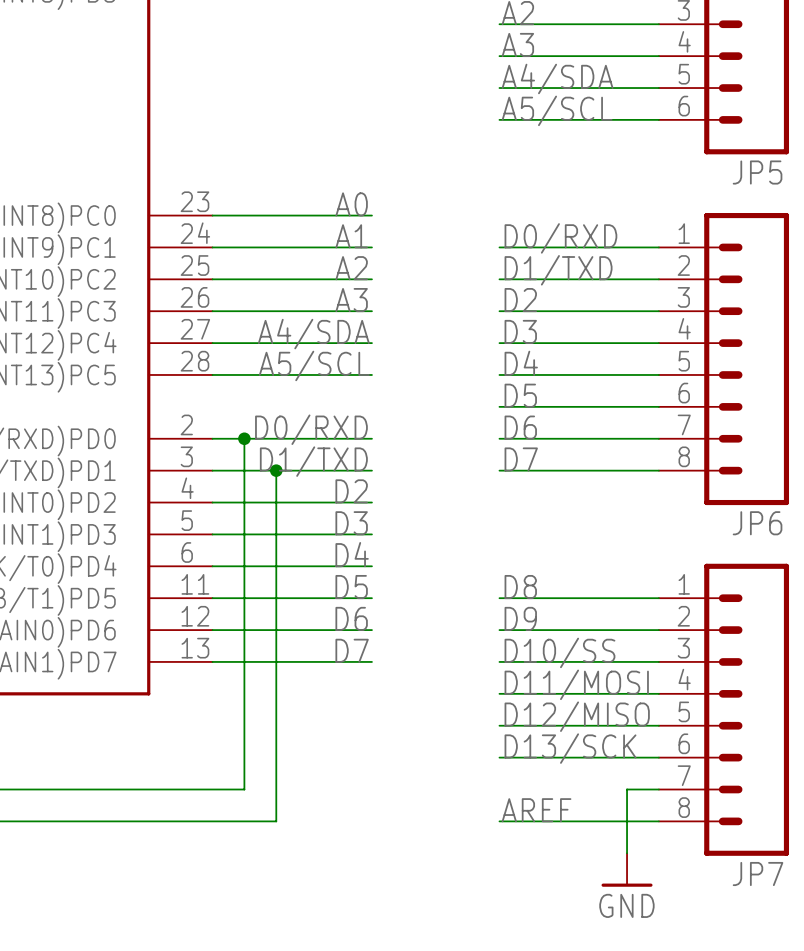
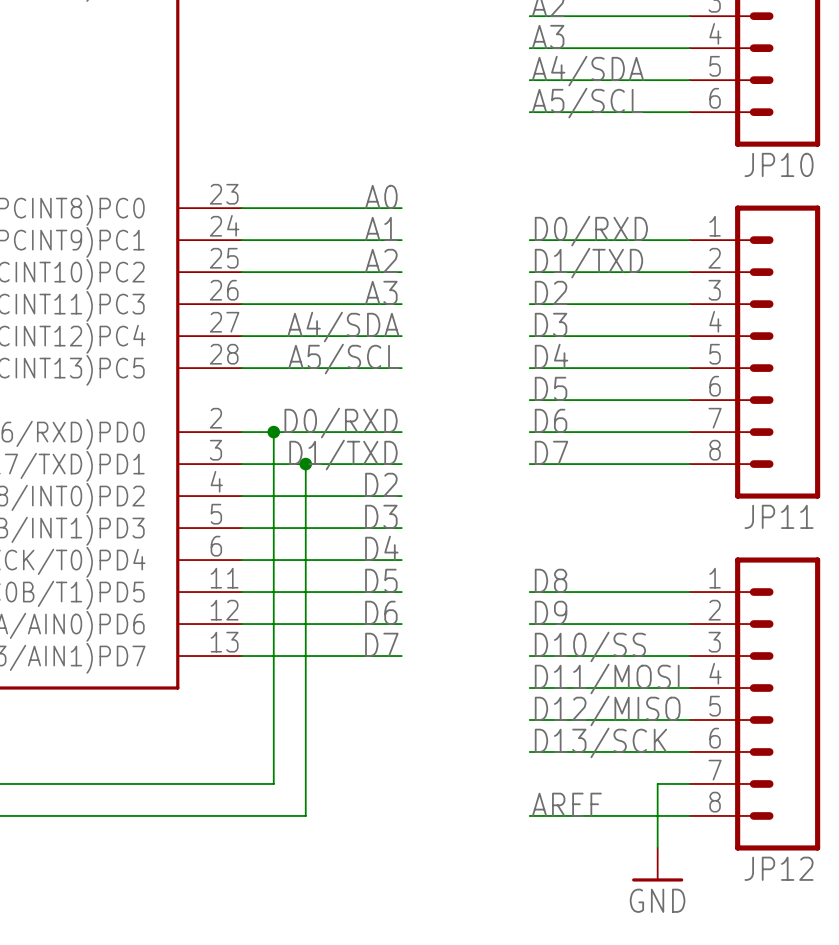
JP5 name: JP5 (757, 172) -> JP10 (779, 164)
JP6 name: JP6 (757, 523) -> JP11 (779, 516)
JP7 name: JP7 (758, 874) -> JP12 (779, 868)

